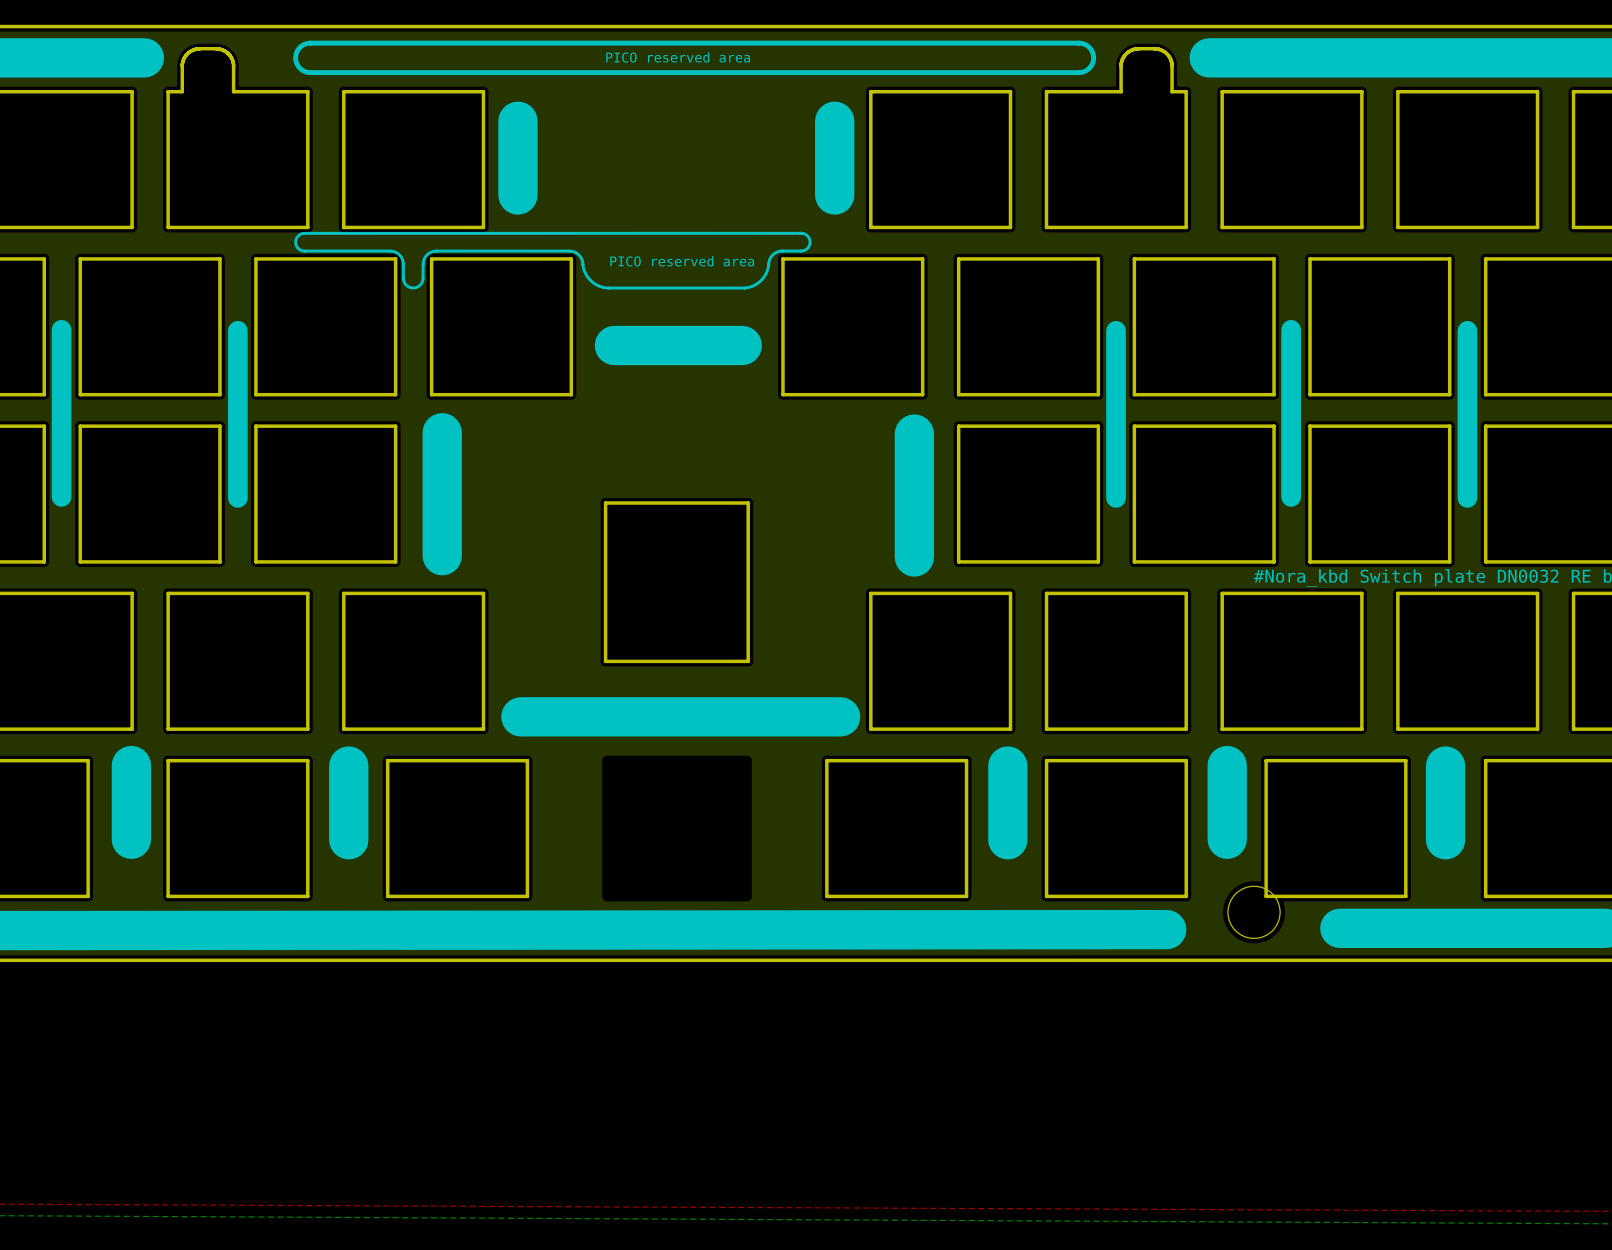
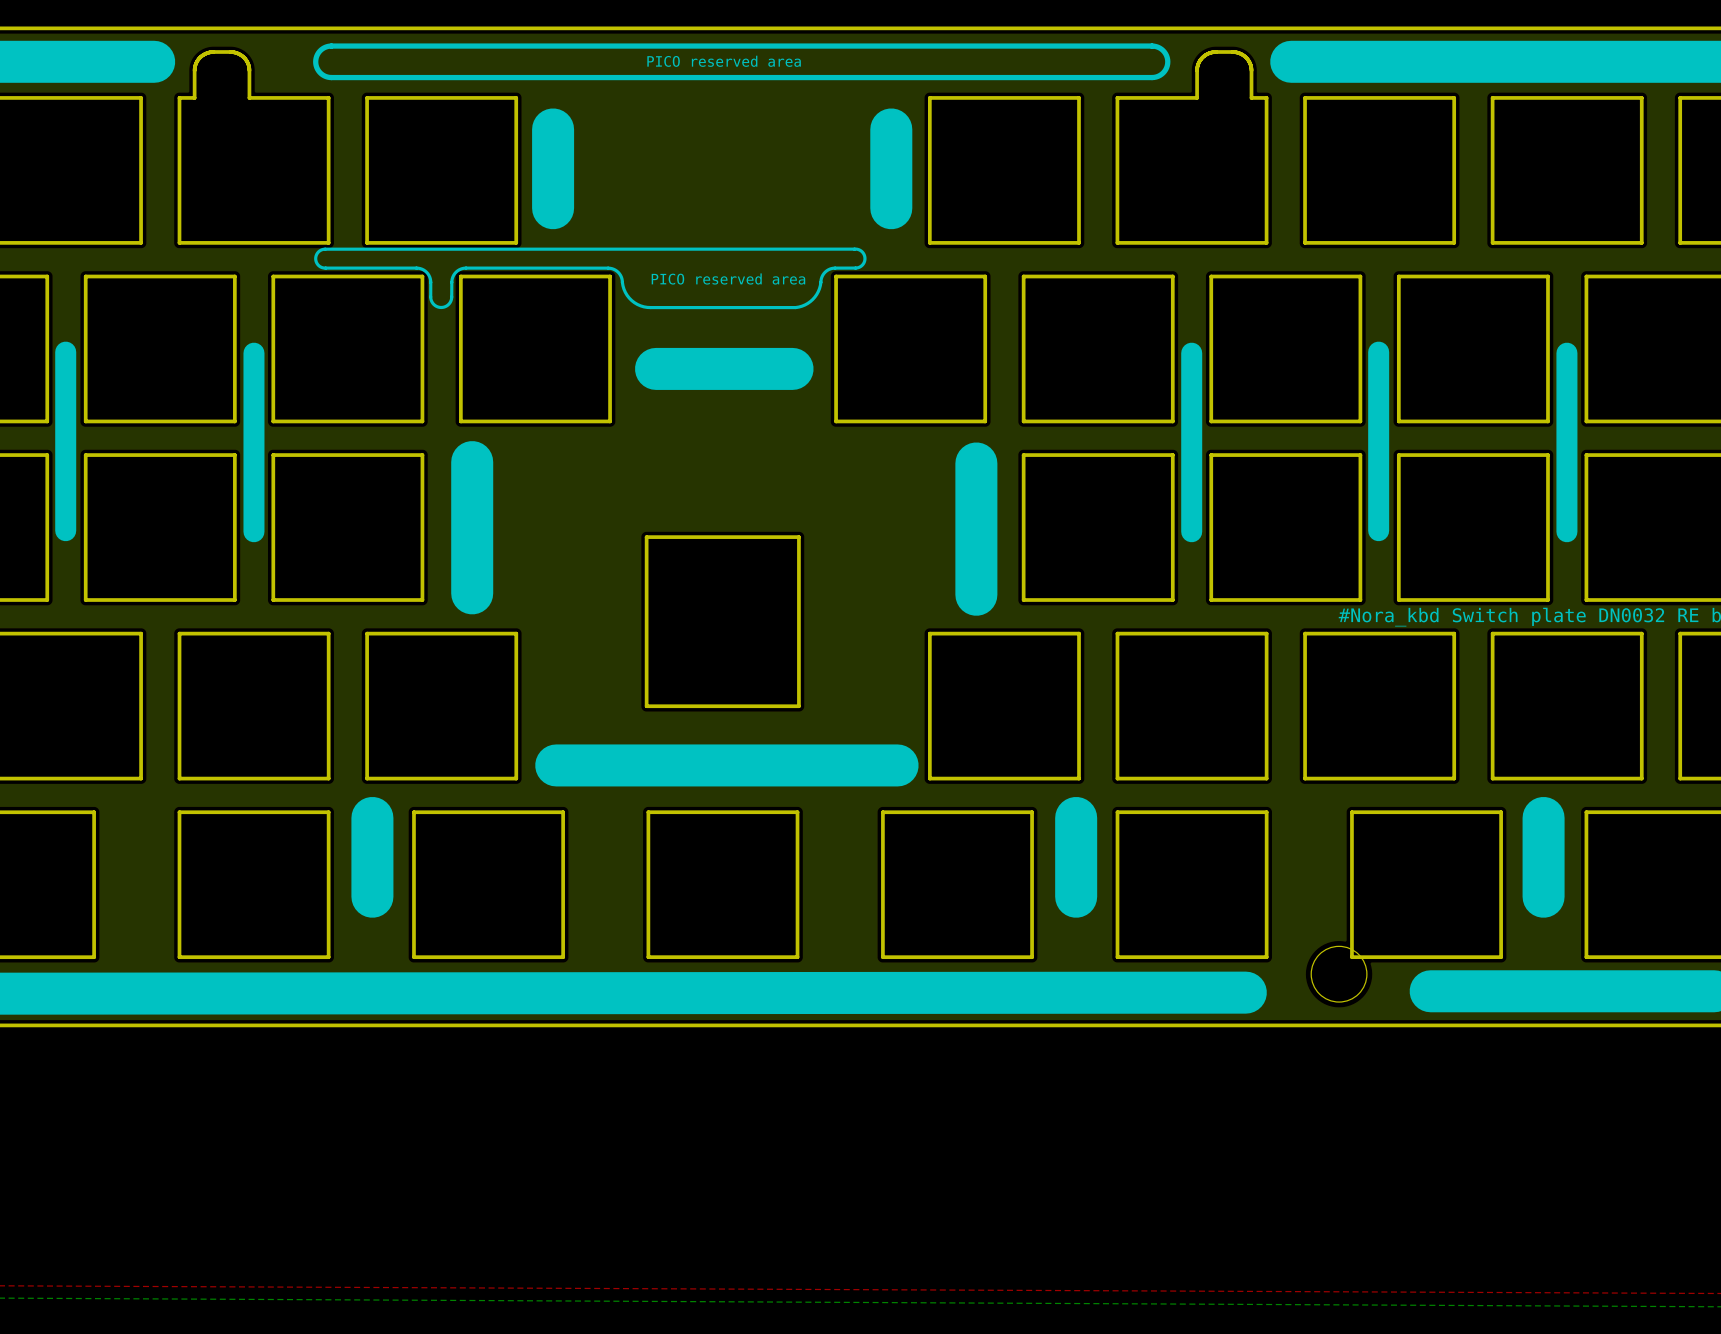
board edge: none -> (797, 812) (797, 957) (648, 957) (648, 812) (797, 812)
line: (131, 765) (131, 839) -> none
line: (1227, 765) (1227, 839) -> none

